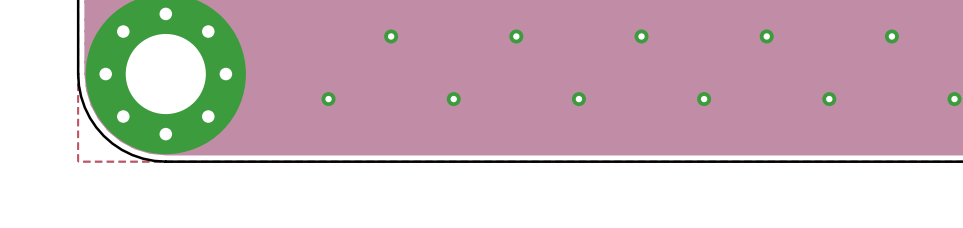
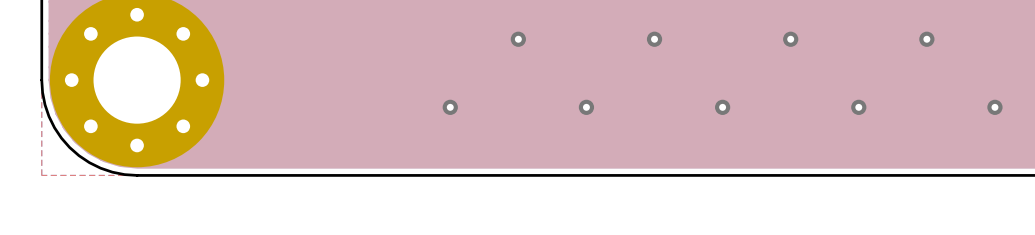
via: (391, 36) -> none
via: (328, 99) -> none

